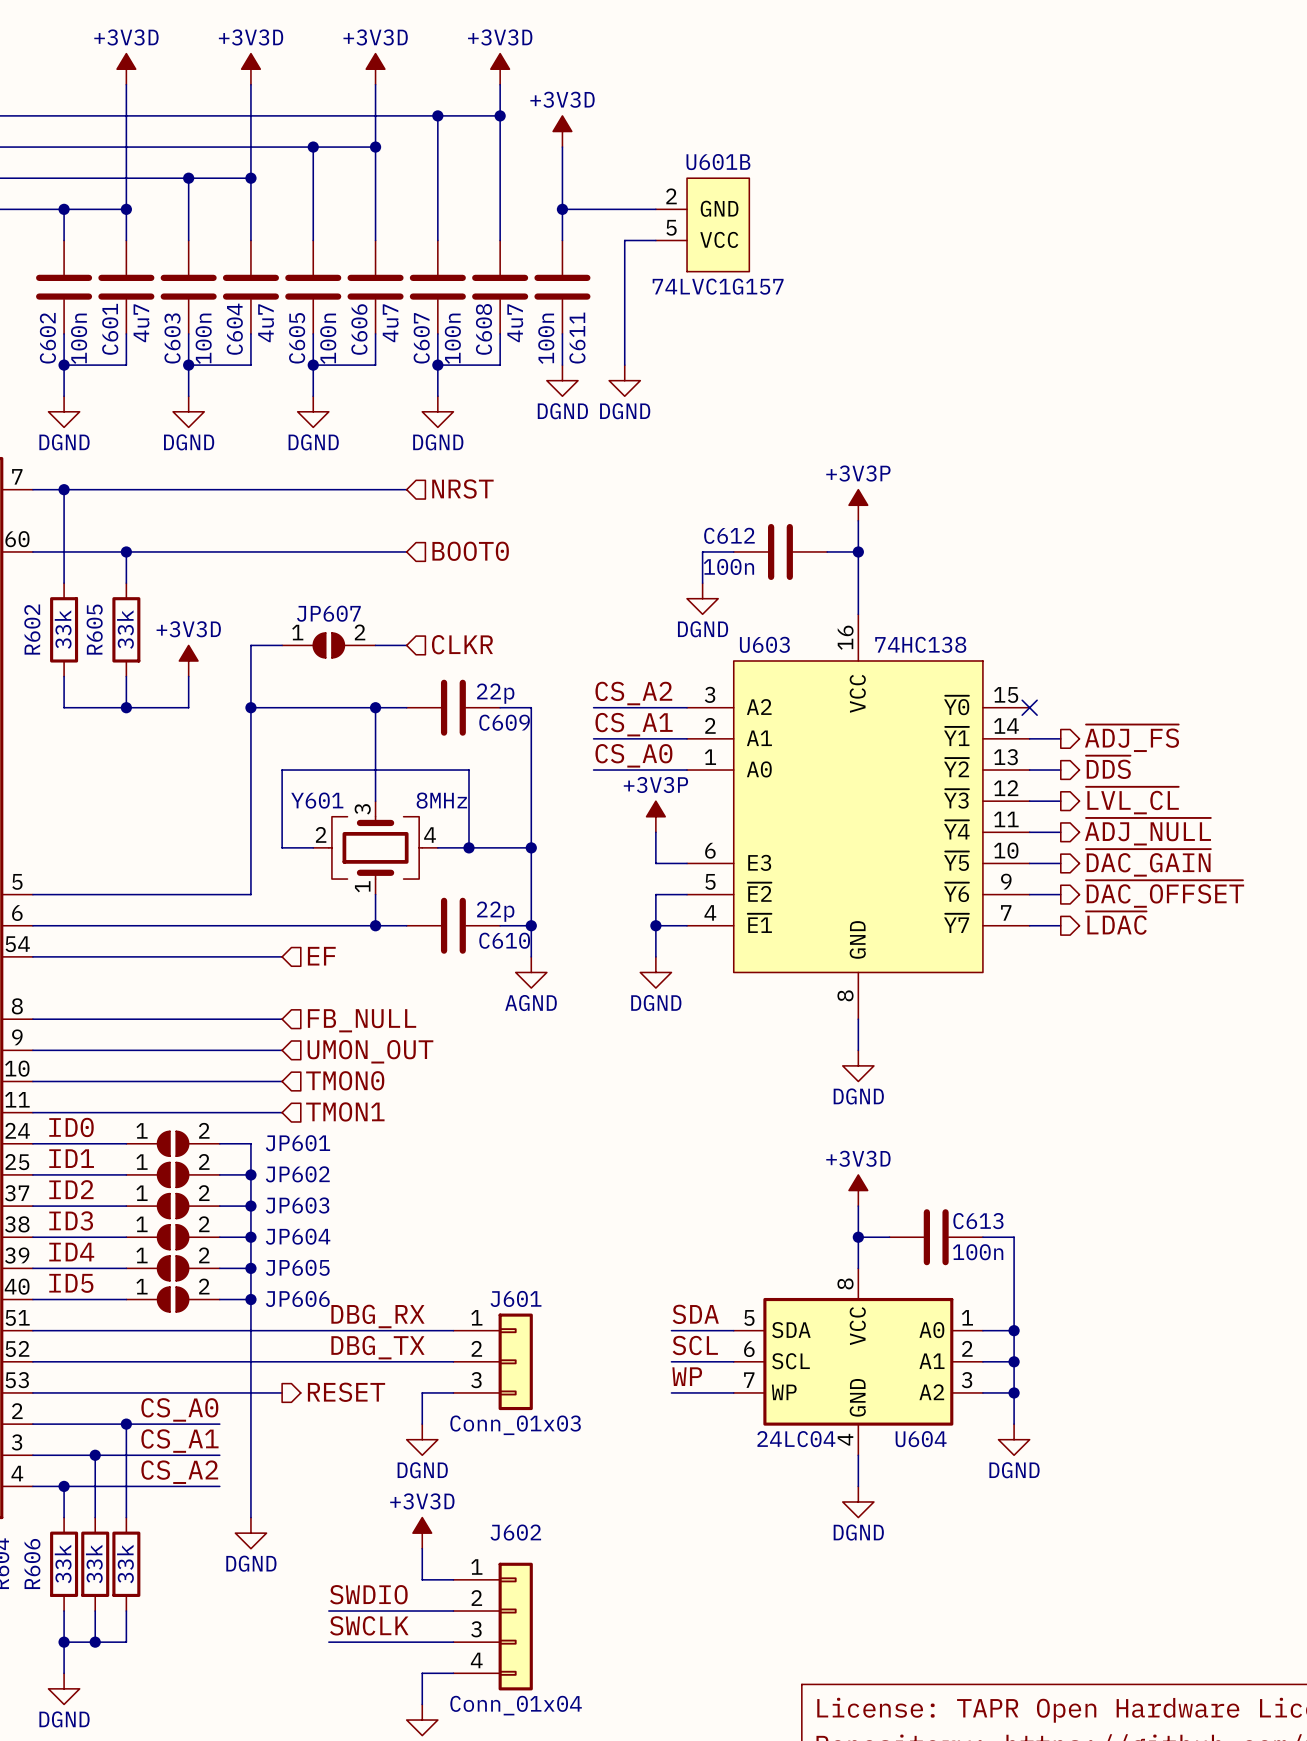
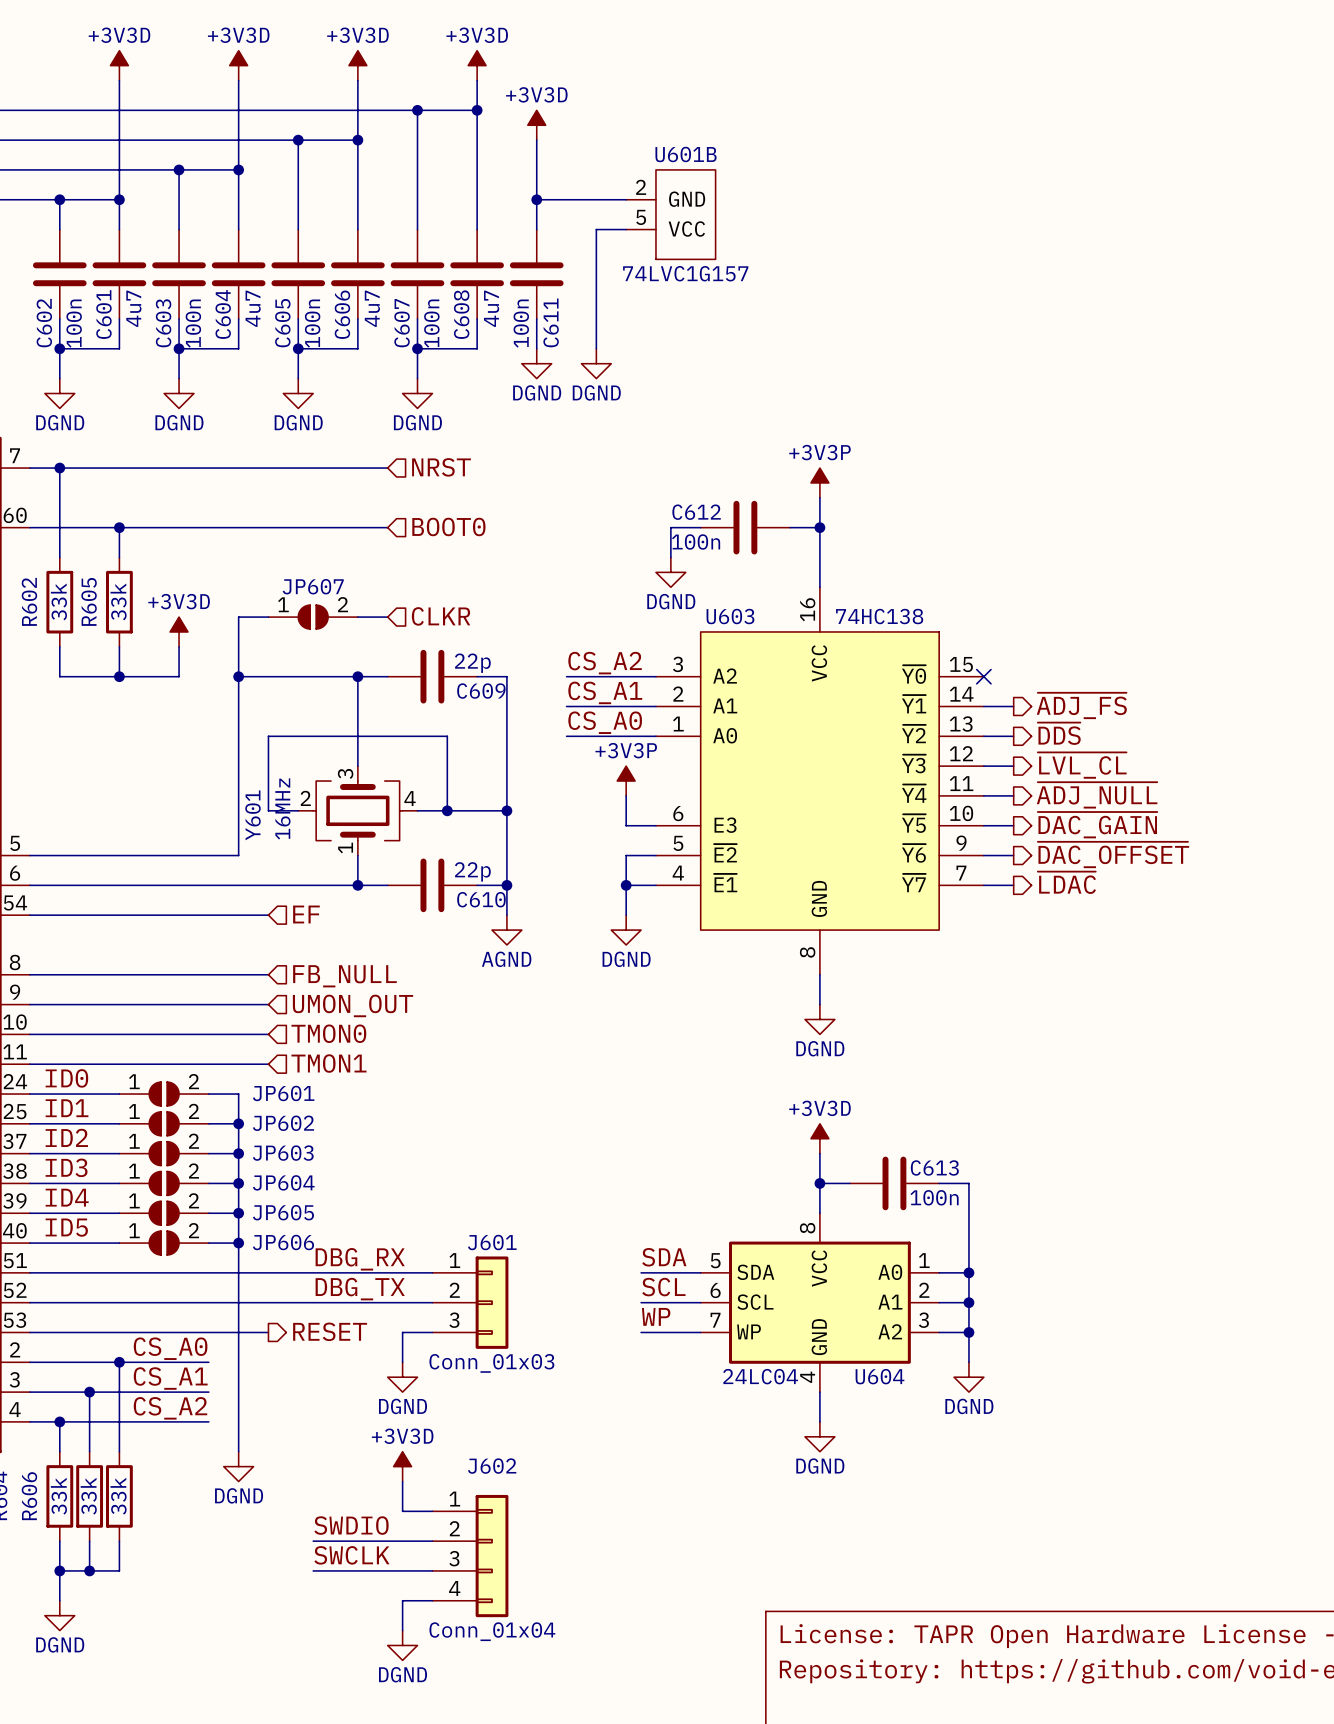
U601B symbol: [655, 178, 750, 272] -> [626, 169, 716, 260]
Y601 name rotation: 0° (317, 800) -> 90° counterclockwise (253, 815)
Y601 value: 8MHz (441, 800) -> 16MHz (282, 808)

